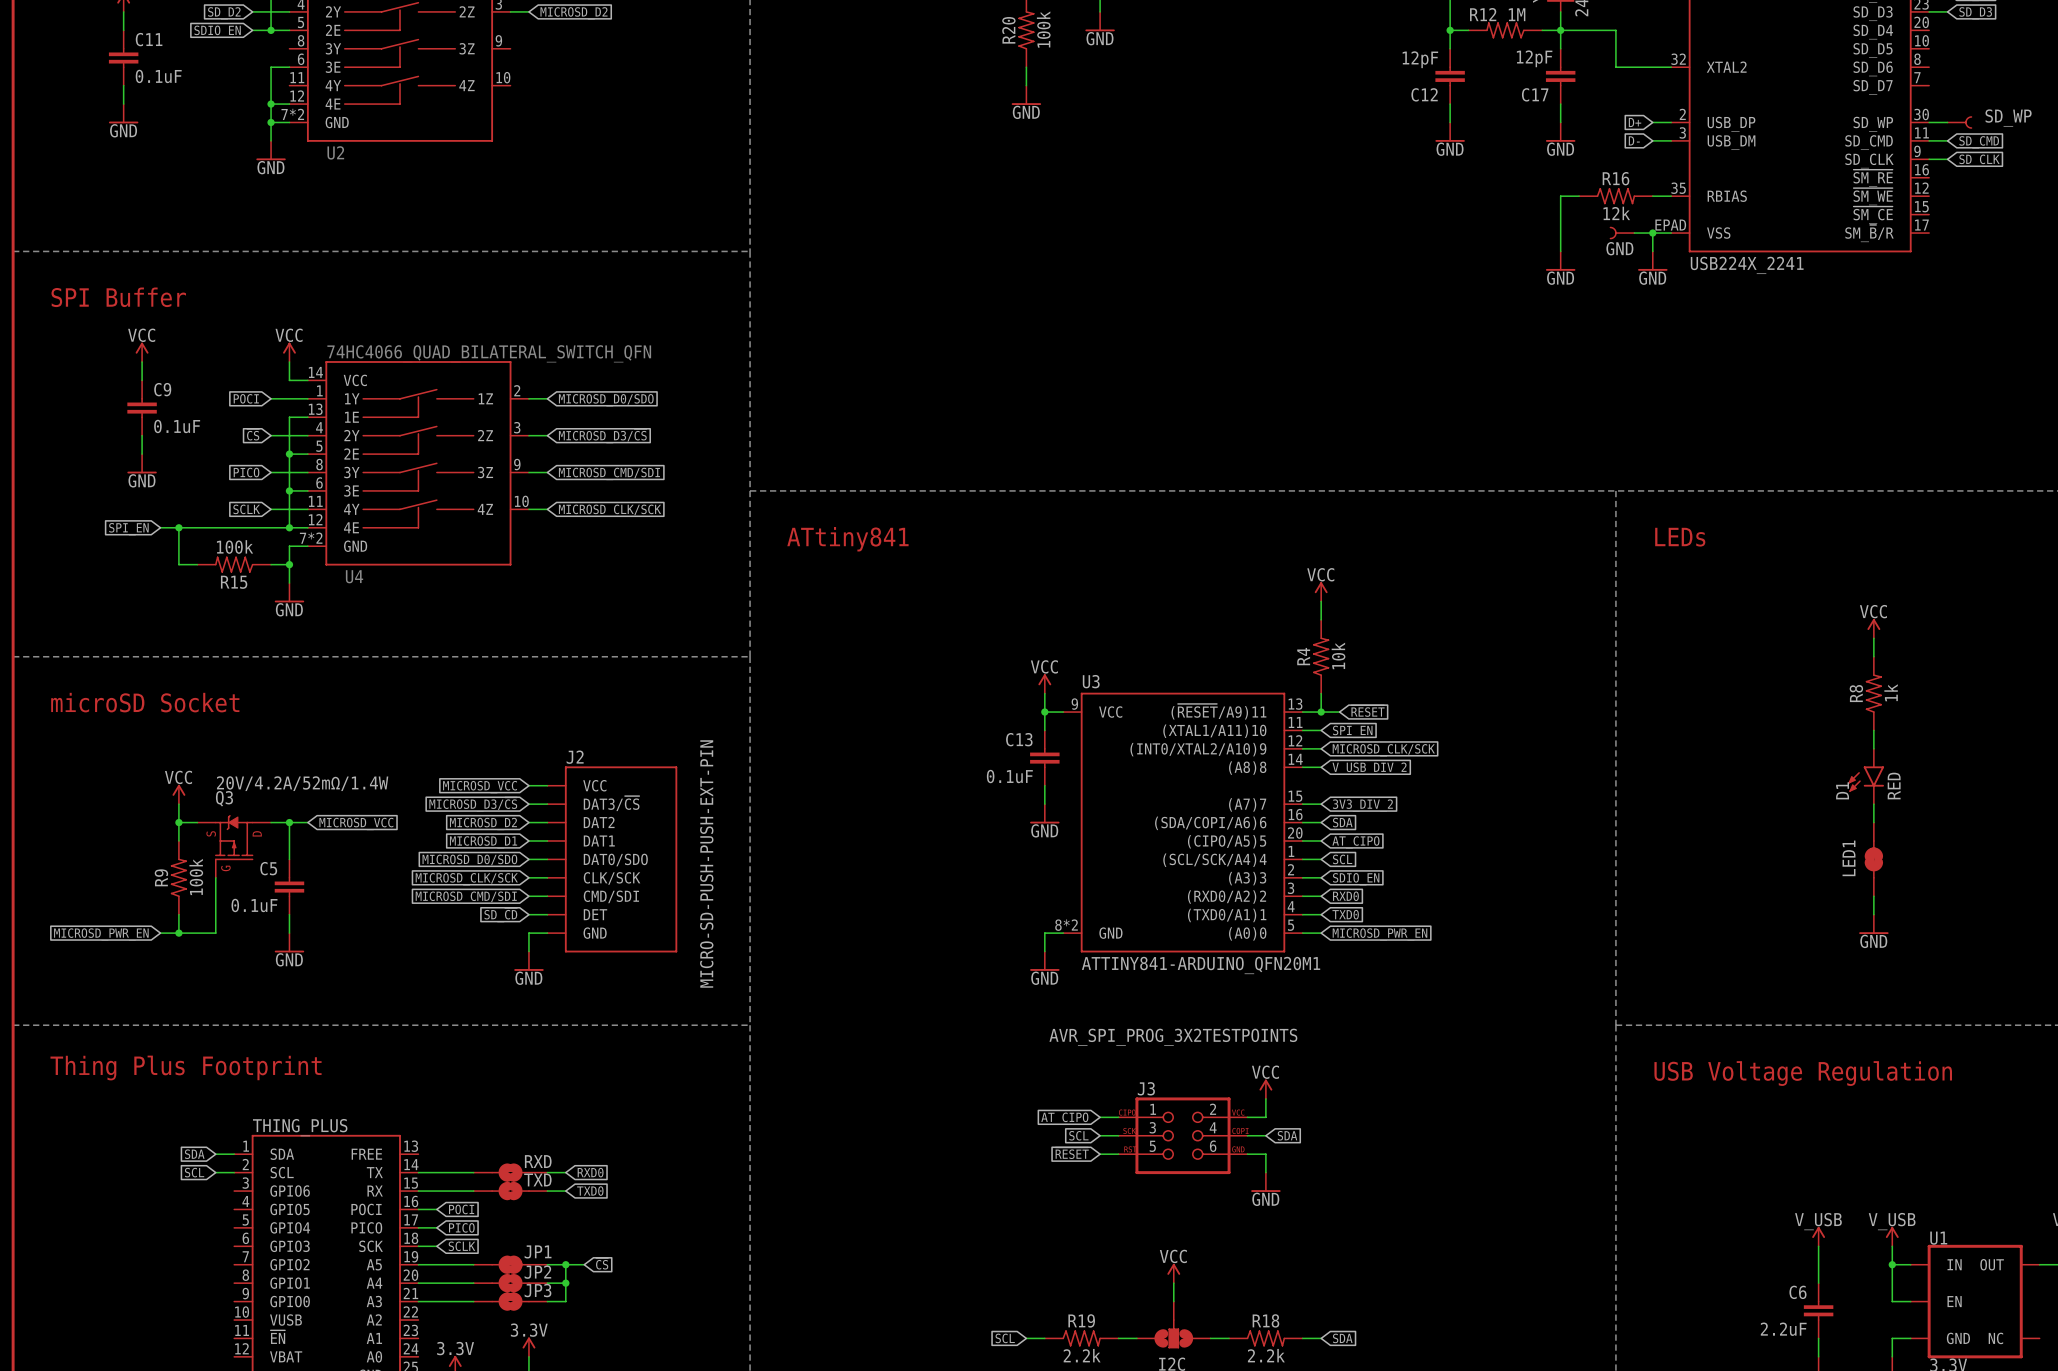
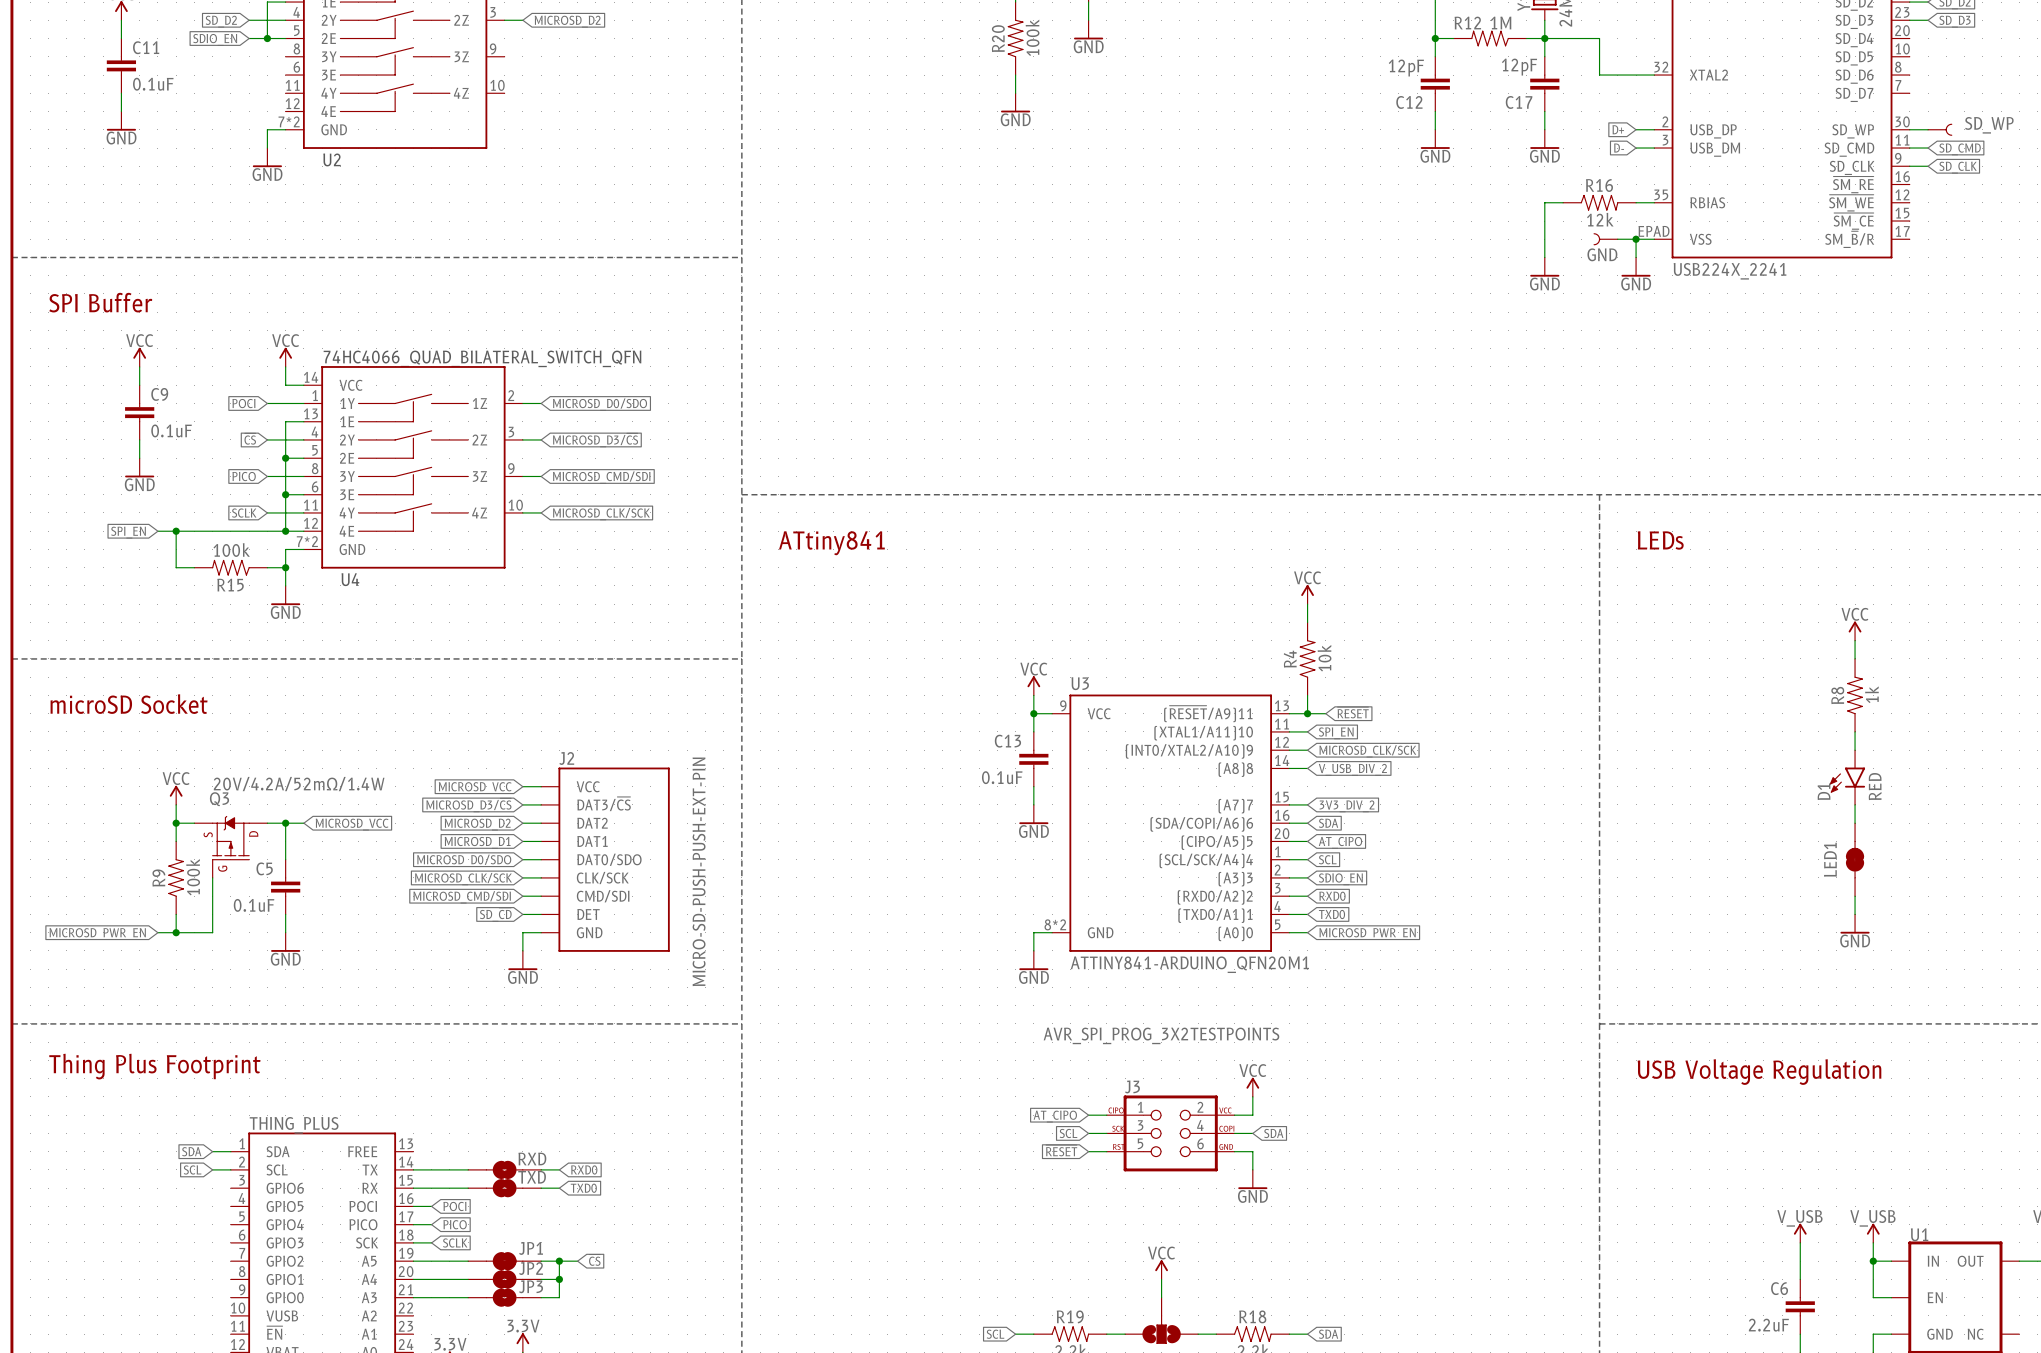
wire: (289, 67) (271, 67) (271, 122) -> none
wire: (271, 104) (289, 104) -> none
junction: (271, 104) -> none
junction: (271, 122) -> none

